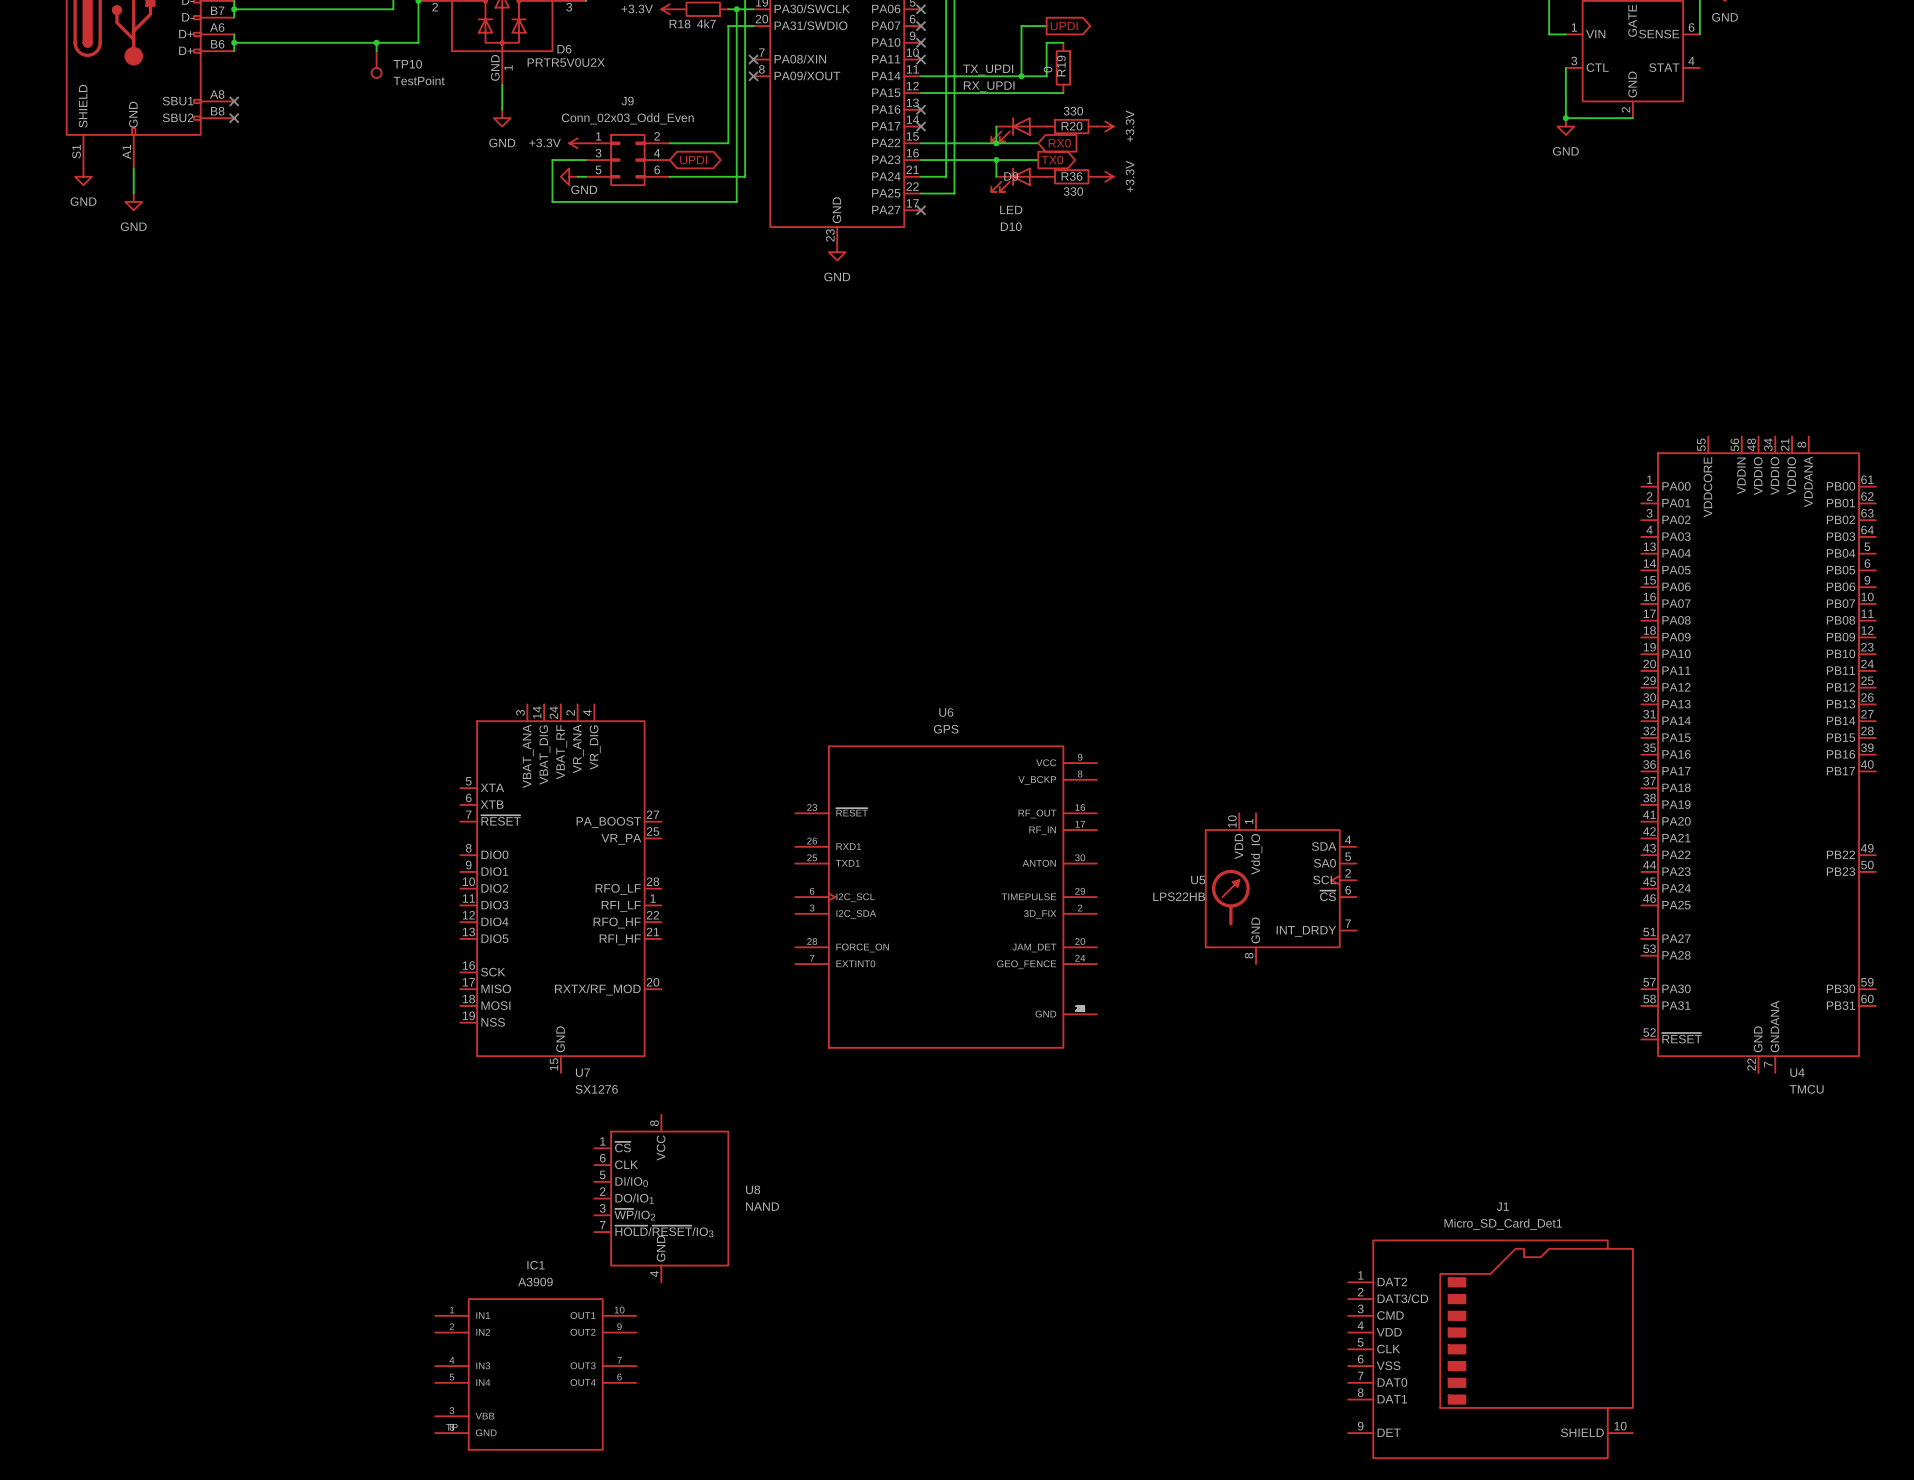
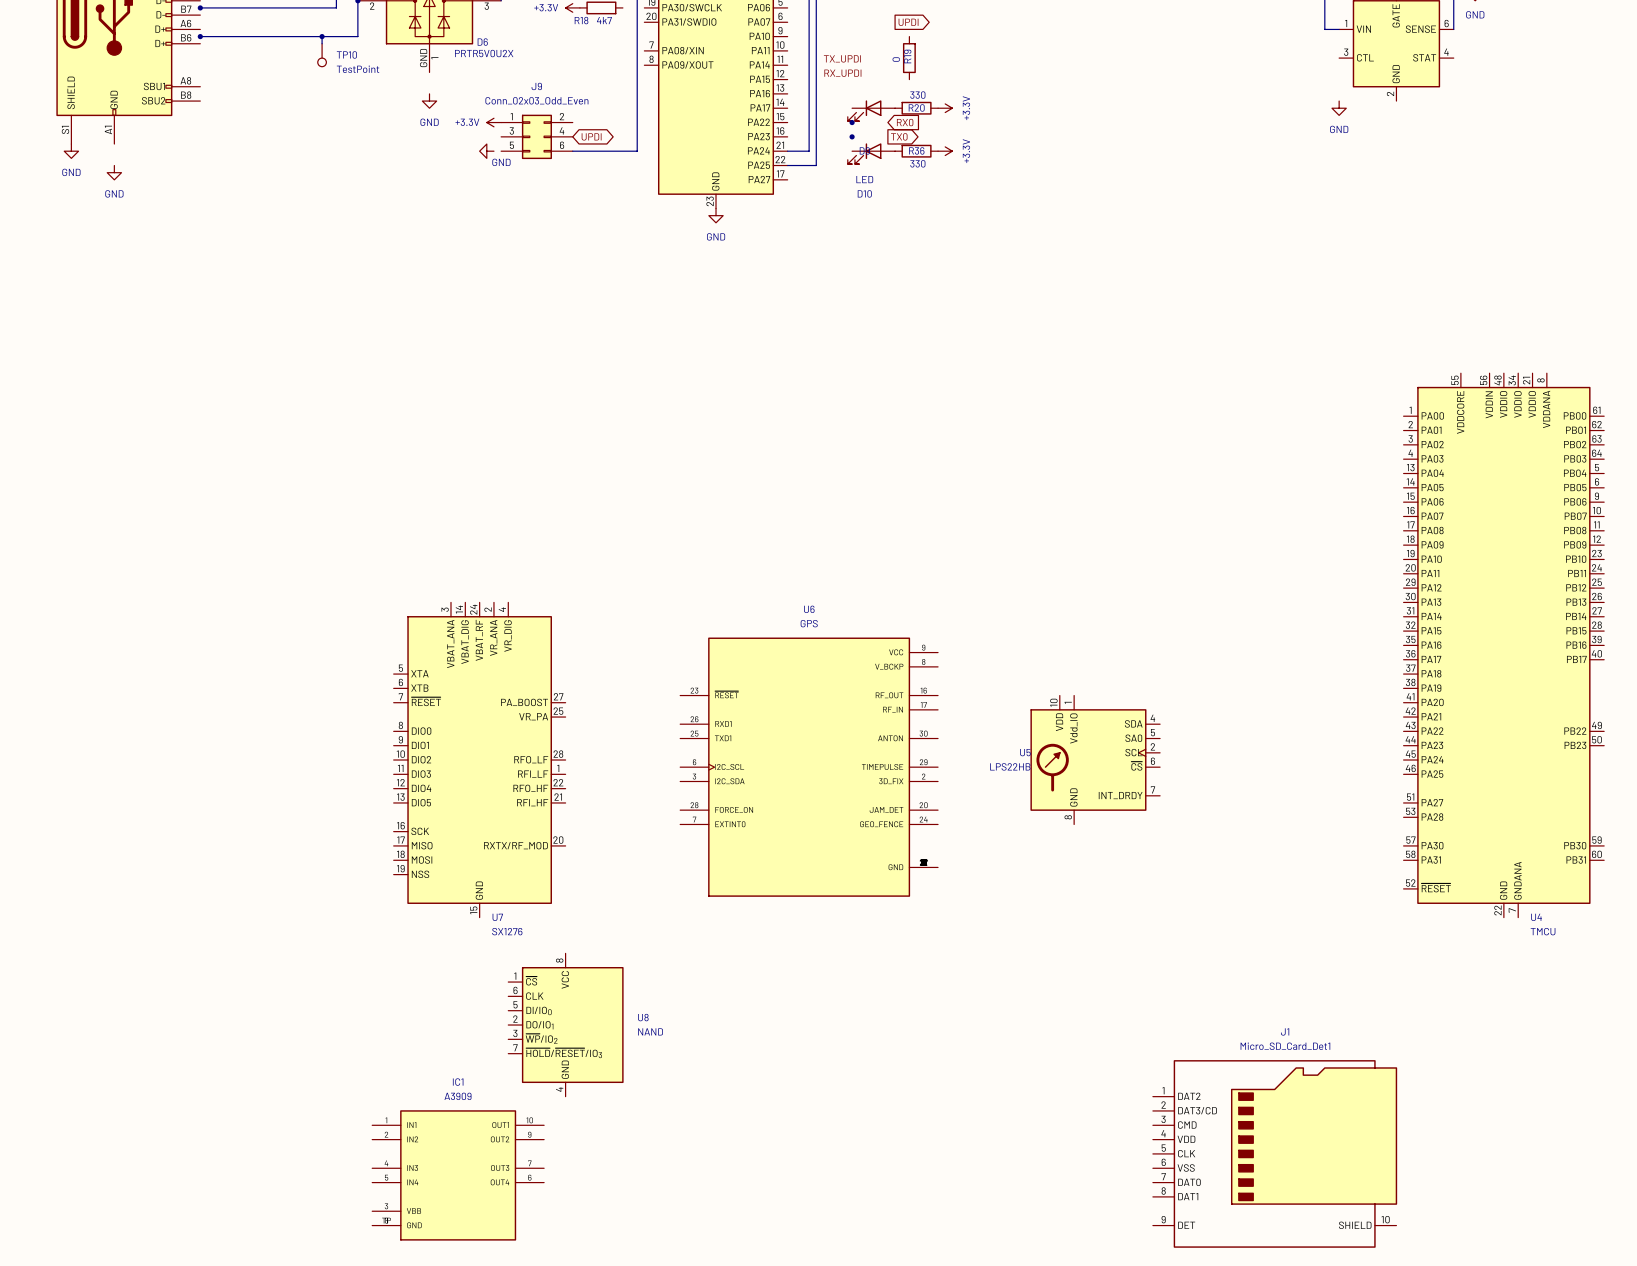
wire: (234, 0) (234, 17) -> none
wire: (728, 9) (753, 9) -> none
wire: (736, 9) (736, 201) (552, 201) (552, 160) (585, 160) -> none
junction: (736, 9) -> none
no-connect mark: (920, 9) -> none
wire: (753, 26) (728, 26) (728, 143) (669, 143) -> none
no-connect mark: (920, 26) -> none
wire: (1046, 26) (1021, 26) (1021, 76) -> none
wire: (234, 34) (234, 51) -> none
no-connect mark: (920, 42) -> none
wire: (1063, 42) (1046, 42) (1046, 76) (920, 76) -> none
no-connect mark: (753, 59) -> none
no-connect mark: (920, 59) -> none
wire: (1565, 67) (1565, 118) (1632, 118) -> none
no-connect mark: (753, 76) -> none
junction: (1021, 76) -> none
wire: (502, 84) (502, 109) -> none
wire: (920, 93) (1063, 93) -> none
no-connect mark: (234, 101) -> none
no-connect mark: (920, 109) -> none
no-connect mark: (234, 118) -> none
junction: (1565, 118) -> none
no-connect mark: (920, 126) -> none
wire: (996, 126) (996, 143) -> none
wire: (920, 143) (1038, 143) -> none
wire: (920, 160) (1038, 160) -> none
wire: (996, 160) (996, 176) -> none
wire: (133, 168) (133, 193) -> none
wire: (577, 176) (585, 176) -> none
no-connect mark: (920, 210) -> none

